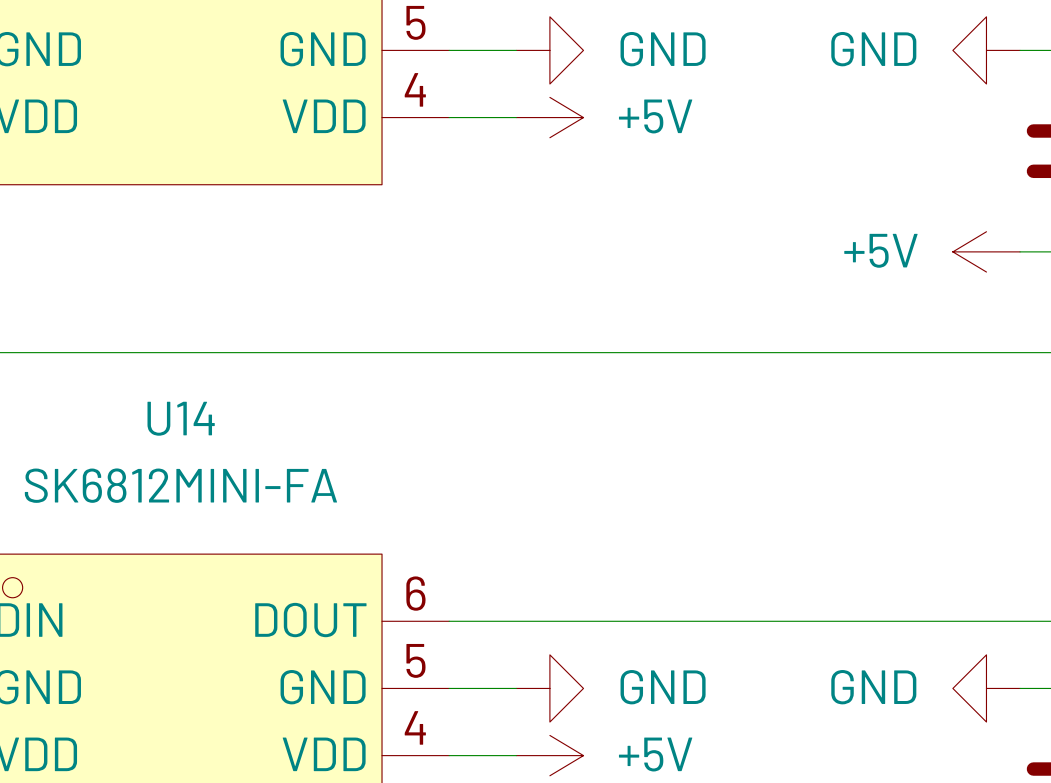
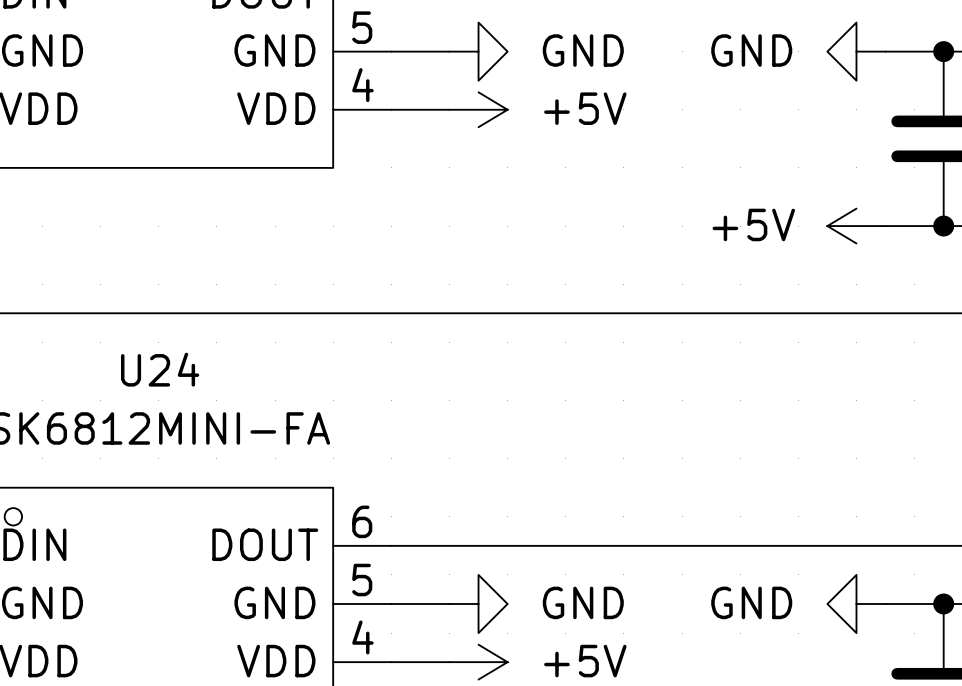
U14 name: U14 (181, 418) -> U24 (160, 369)

